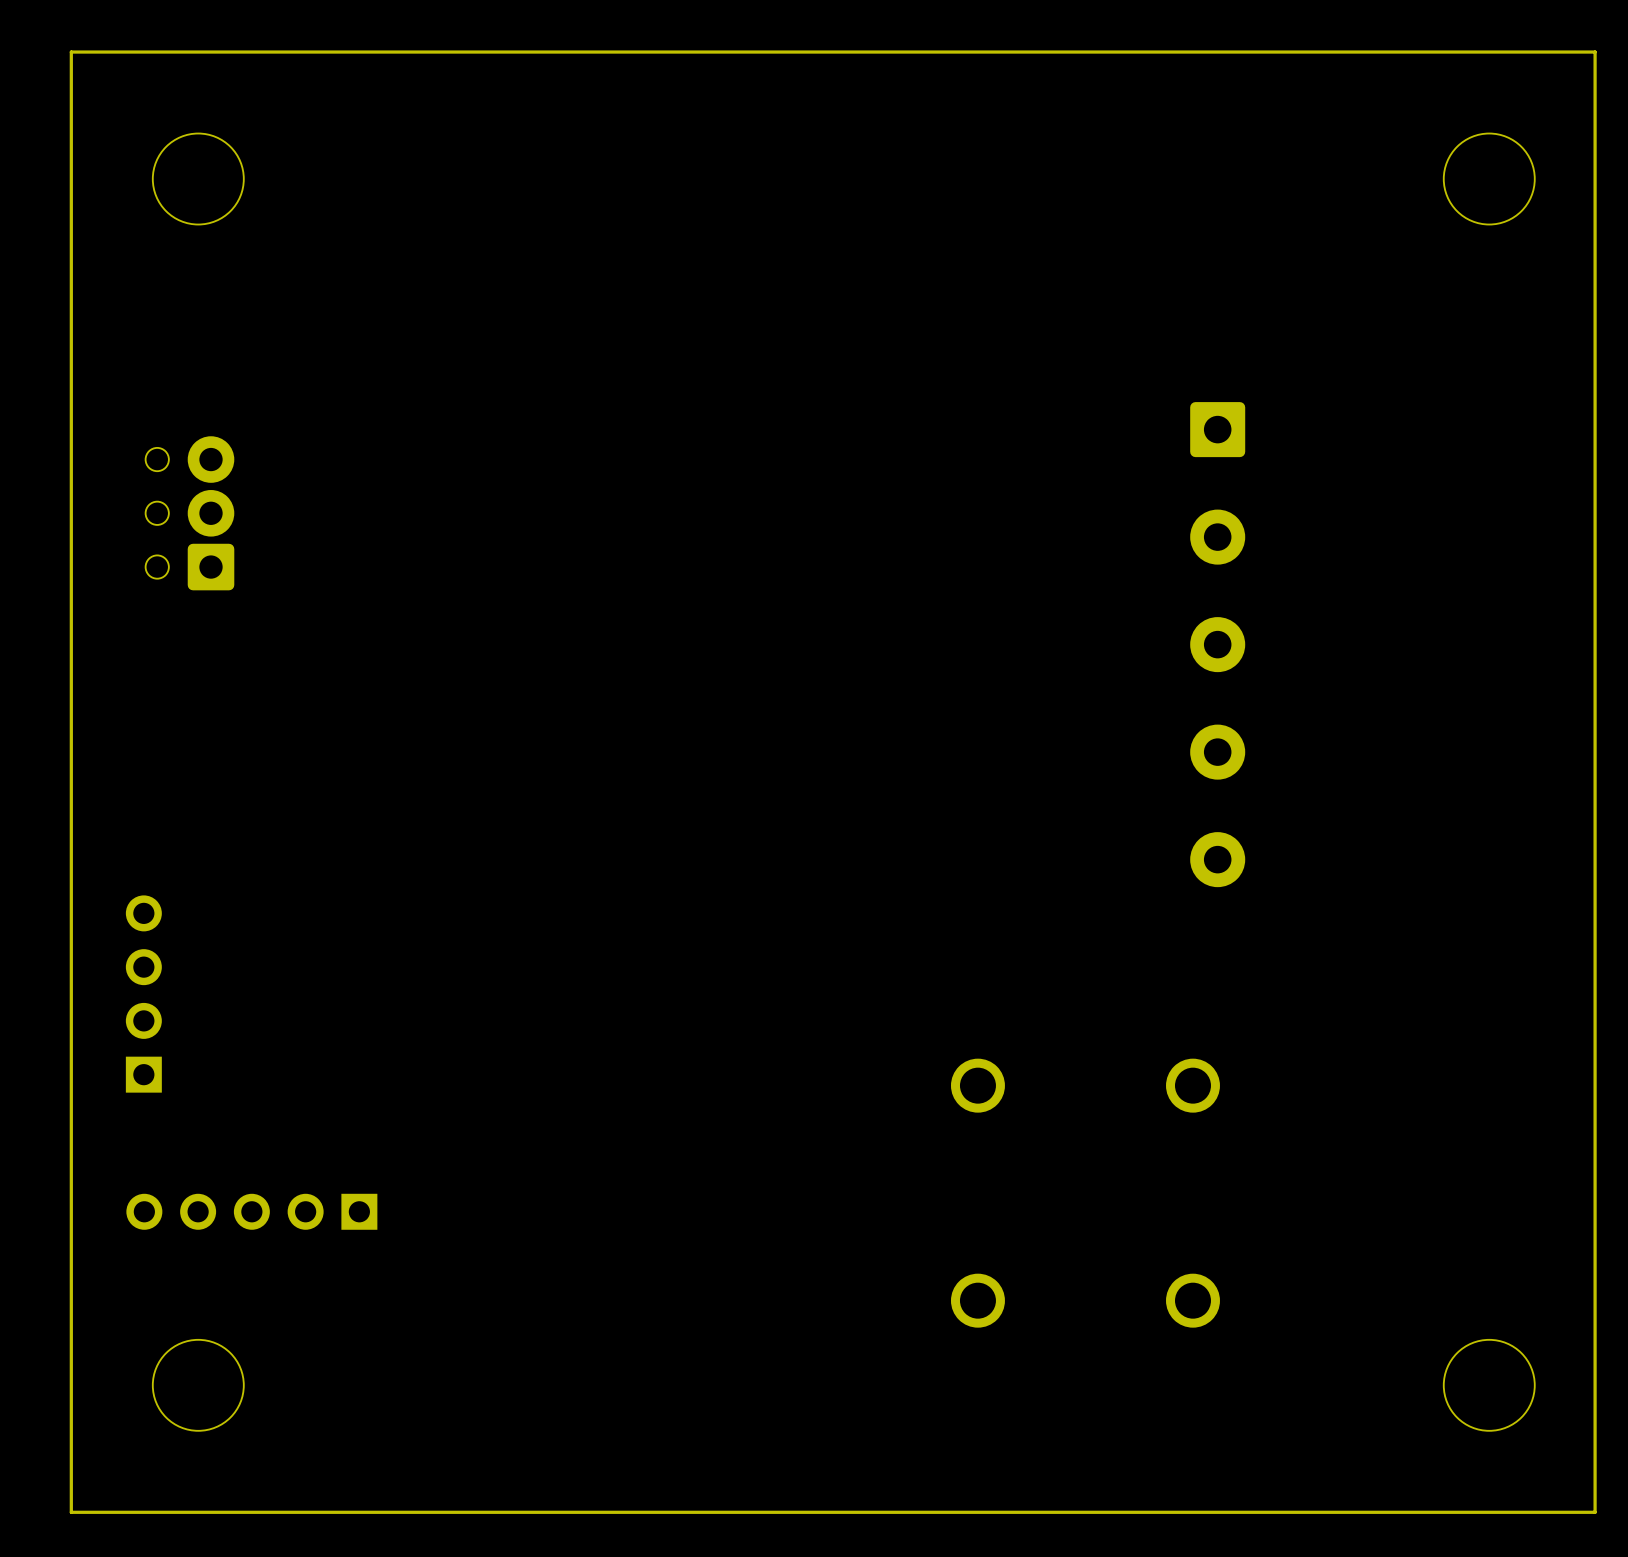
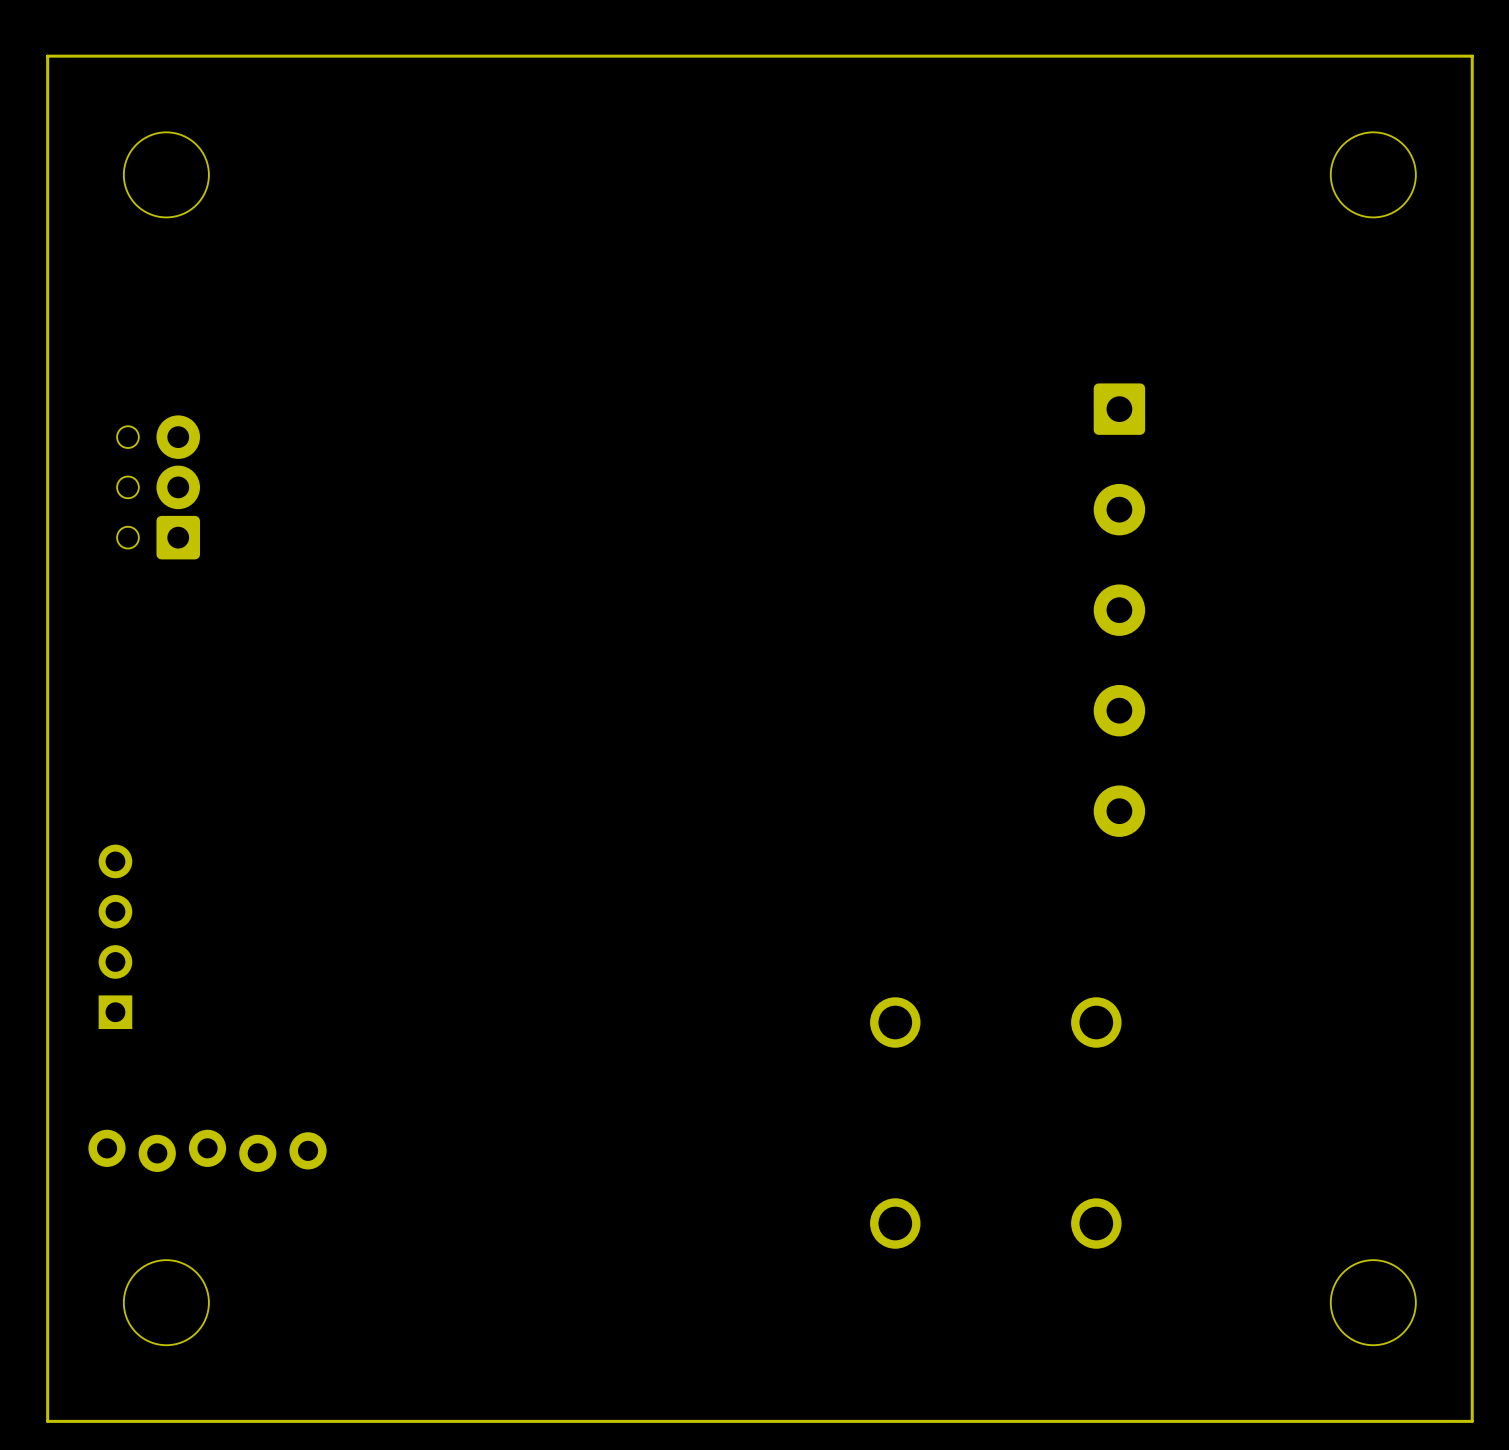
part footprint: [126, 1193, 378, 1230] -> [88, 1129, 327, 1172]

